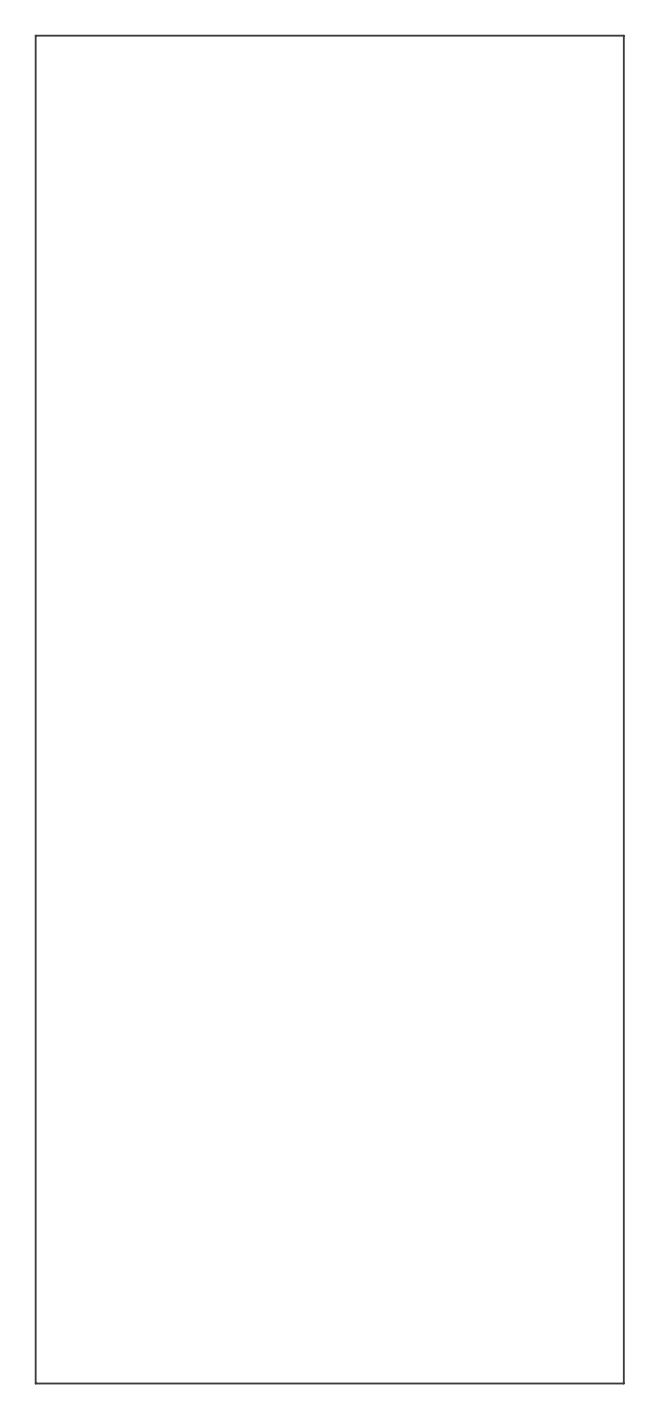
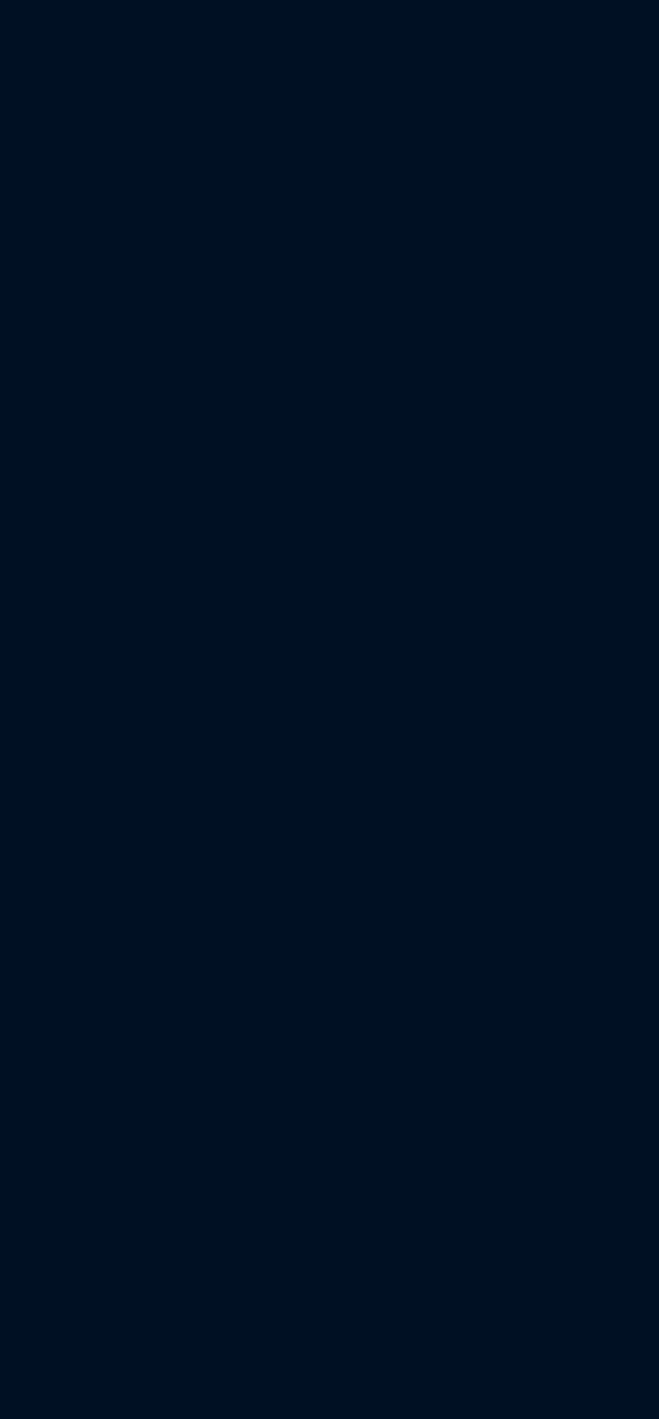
line: (35, 35) (623, 35) (623, 1383) (35, 1383) (35, 35) -> none

